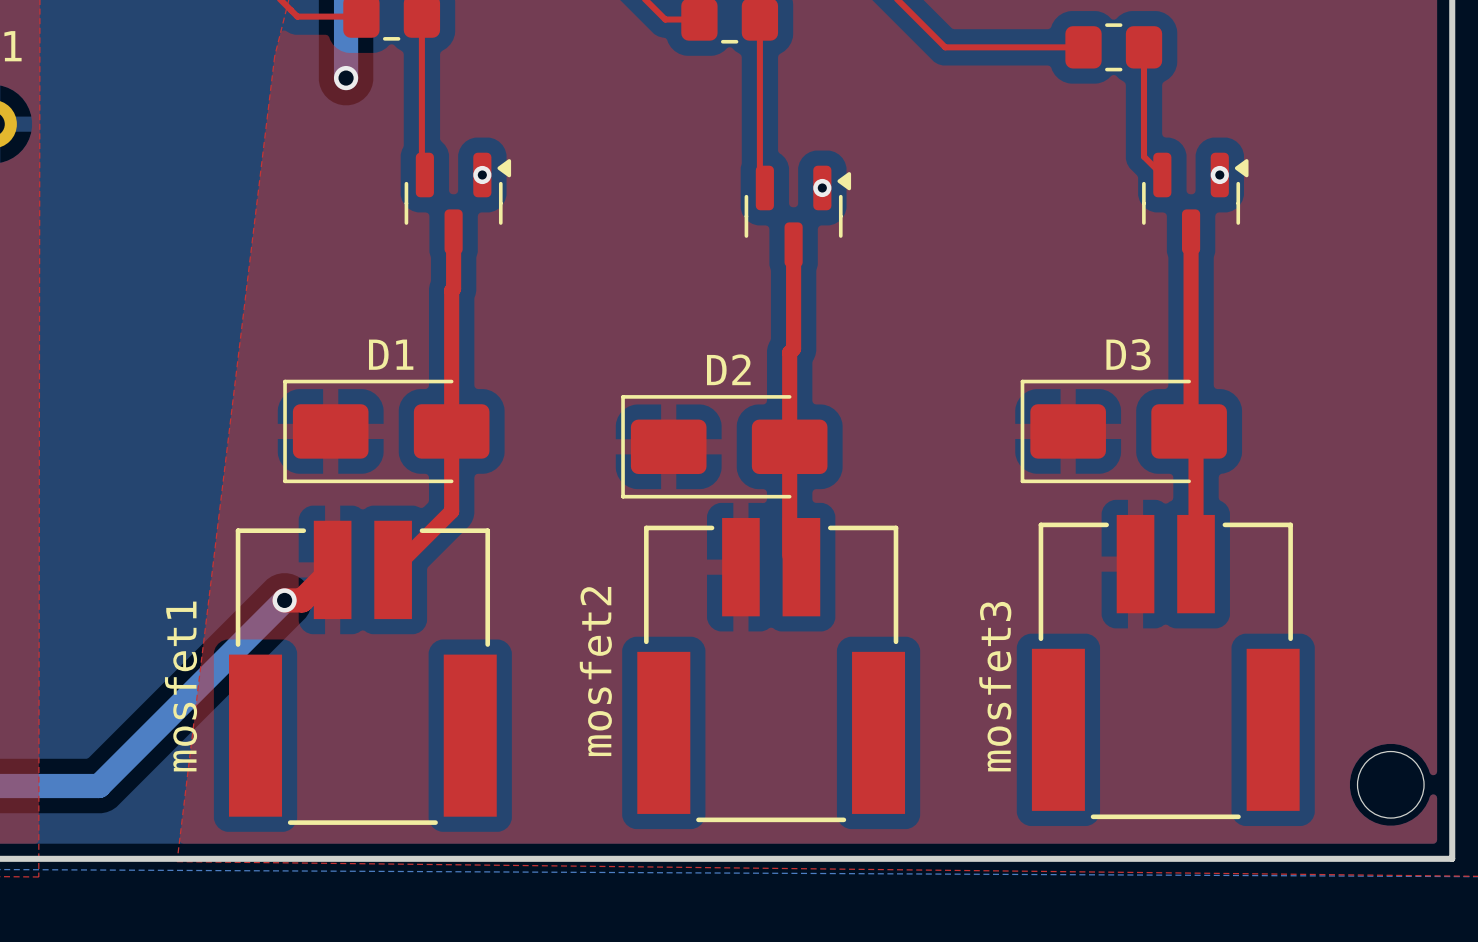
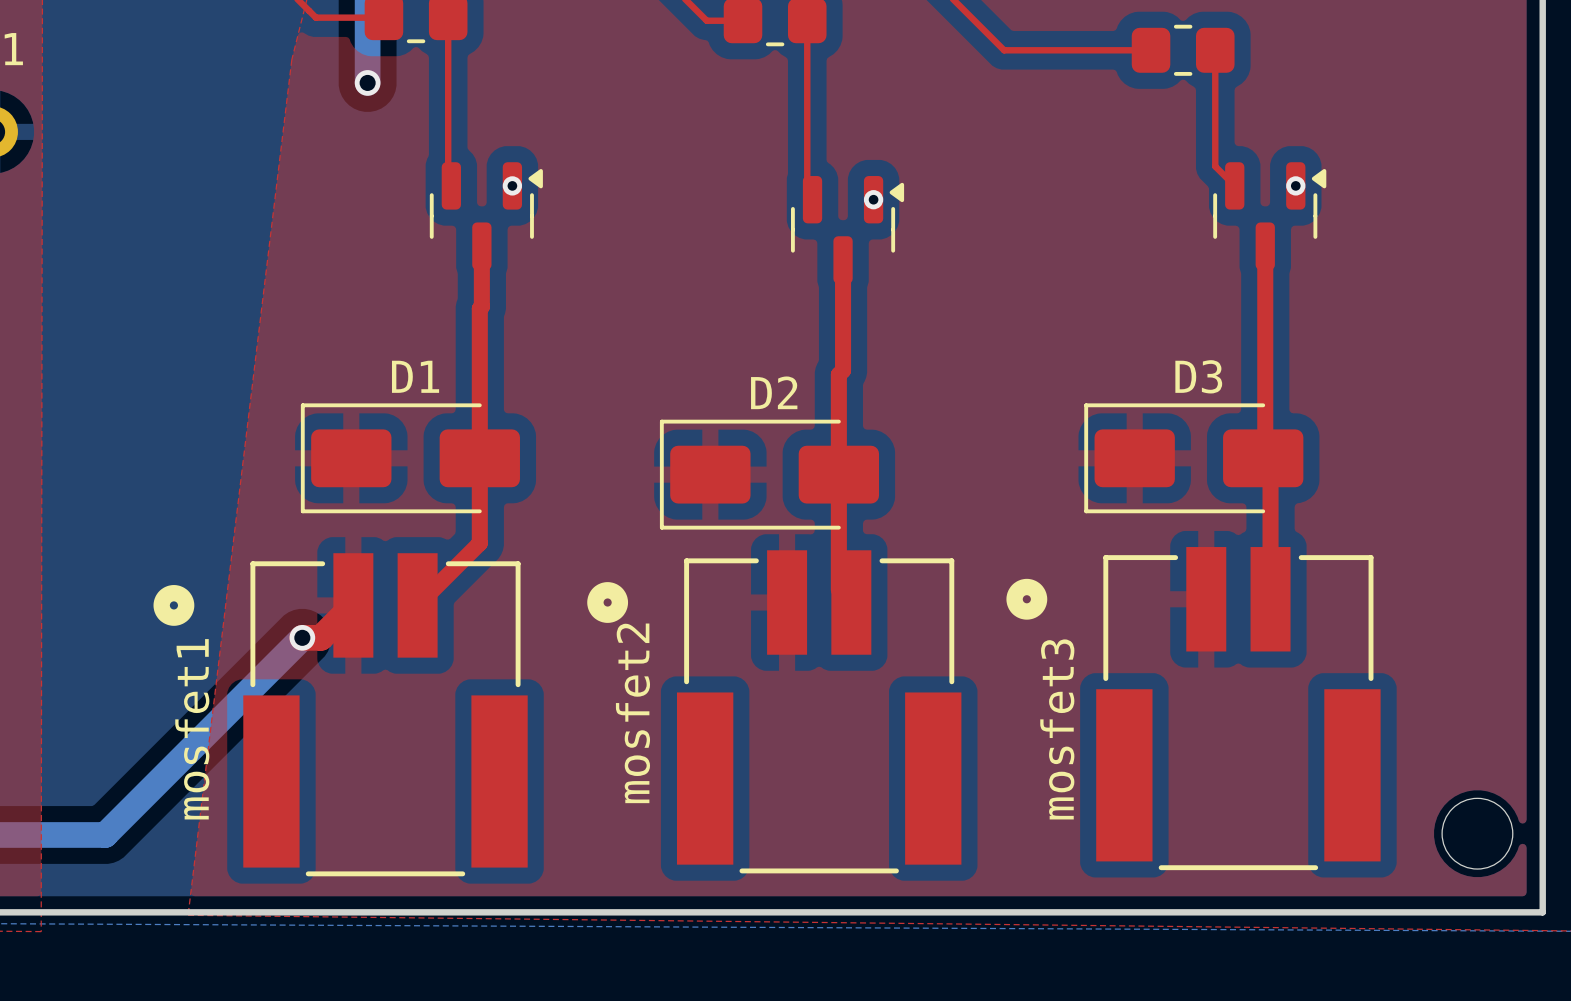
mosfet3 footprint: [1031, 514, 1300, 820] -> [1006, 547, 1381, 871]
mosfet2 footprint: [637, 518, 906, 823] -> [587, 550, 962, 874]
mosfet1 footprint: [229, 520, 497, 825] -> [153, 553, 528, 877]

